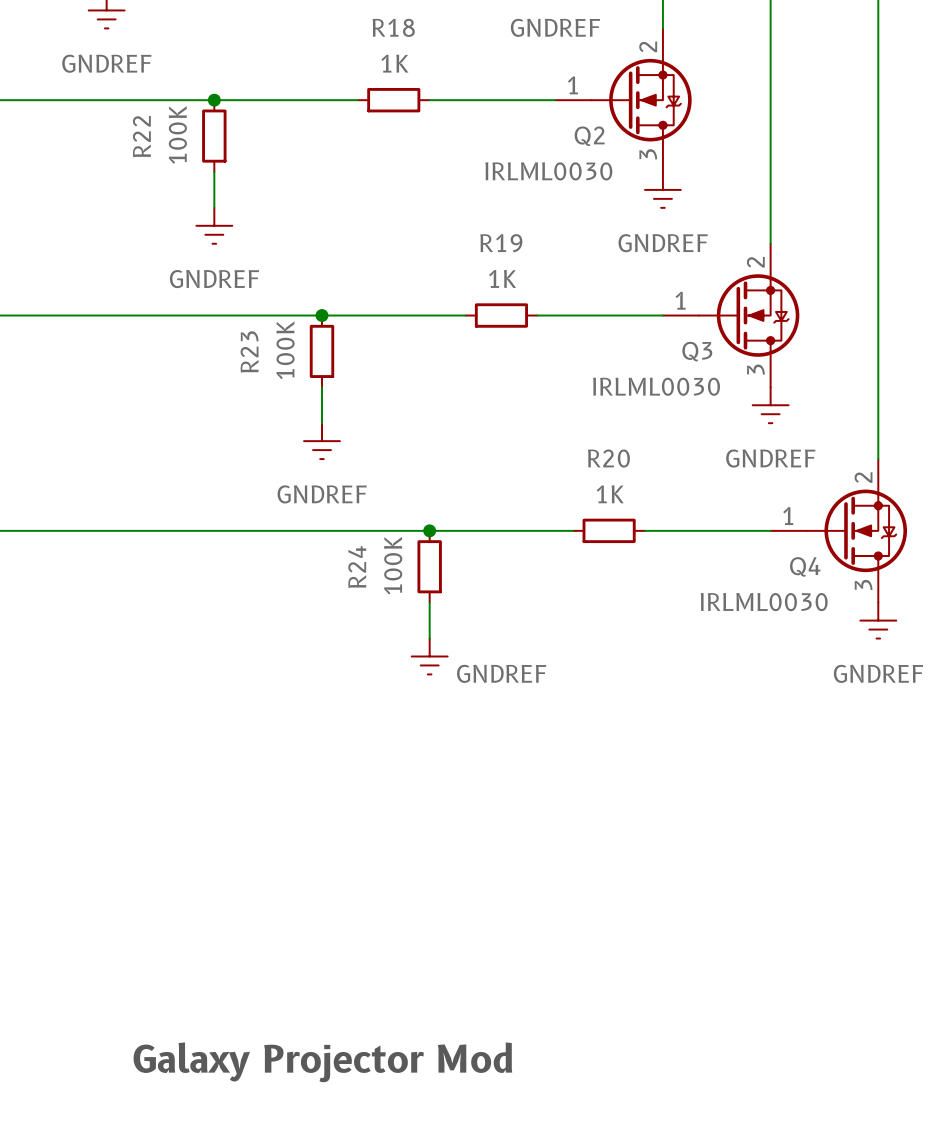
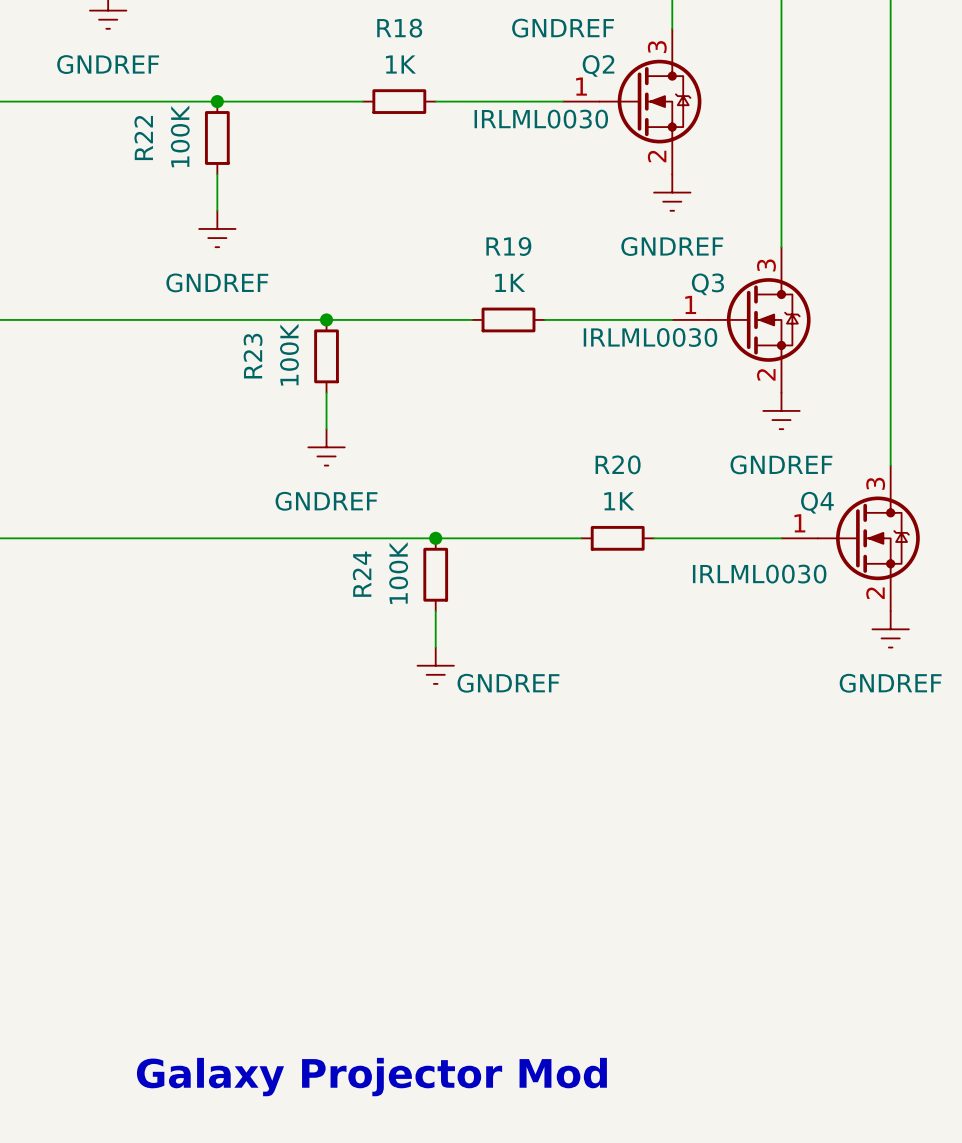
Q2 flip: as is (641, 100) -> up-down (650, 101)
Q2 value position: IRLML0030 (548, 171) -> IRLML0030 (541, 119)
Q3 flip: as is (749, 315) -> up-down (759, 319)
Q3 value position: IRLML0030 (656, 386) -> IRLML0030 (650, 337)
Q4 flip: as is (856, 530) -> up-down (868, 538)
Q4 value position: IRLML0030 (764, 602) -> IRLML0030 (759, 574)

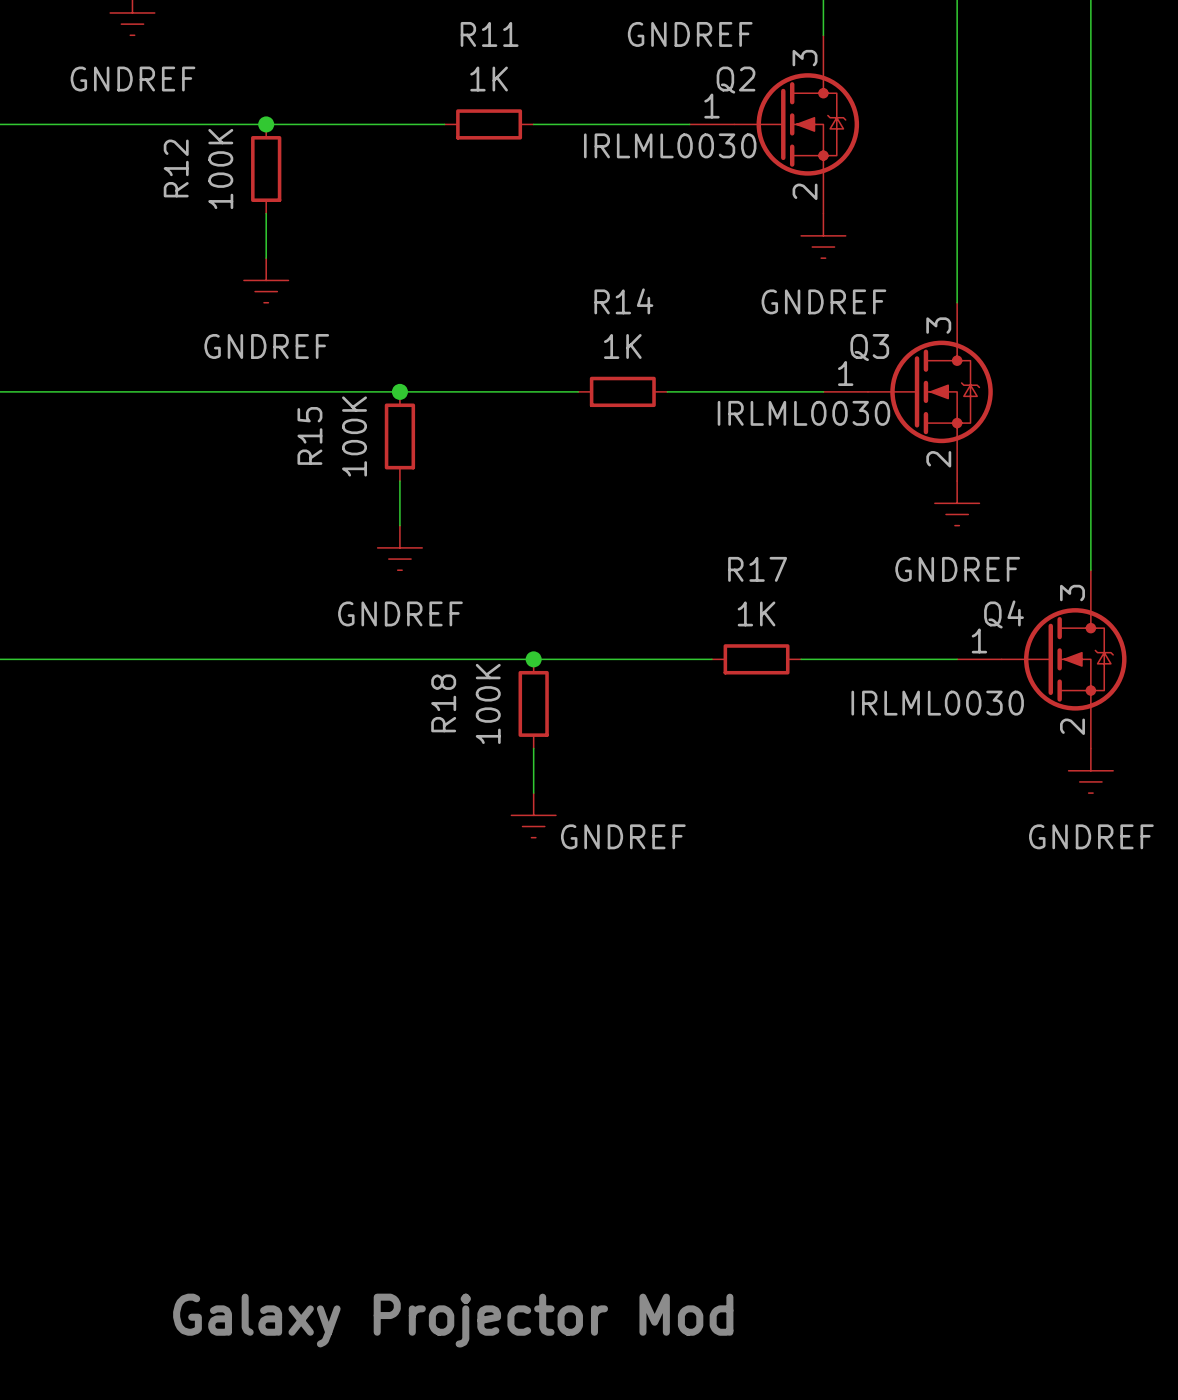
R18 name: R18 (399, 28) -> R11 (489, 34)
R22 name: R22 (143, 138) -> R12 (176, 168)
R19 name: R19 (508, 246) -> R14 (623, 301)
R23 name: R23 (253, 356) -> R15 (309, 435)
R20 name: R20 (618, 464) -> R17 (757, 569)
R24 name: R24 (362, 574) -> R18 (443, 703)

